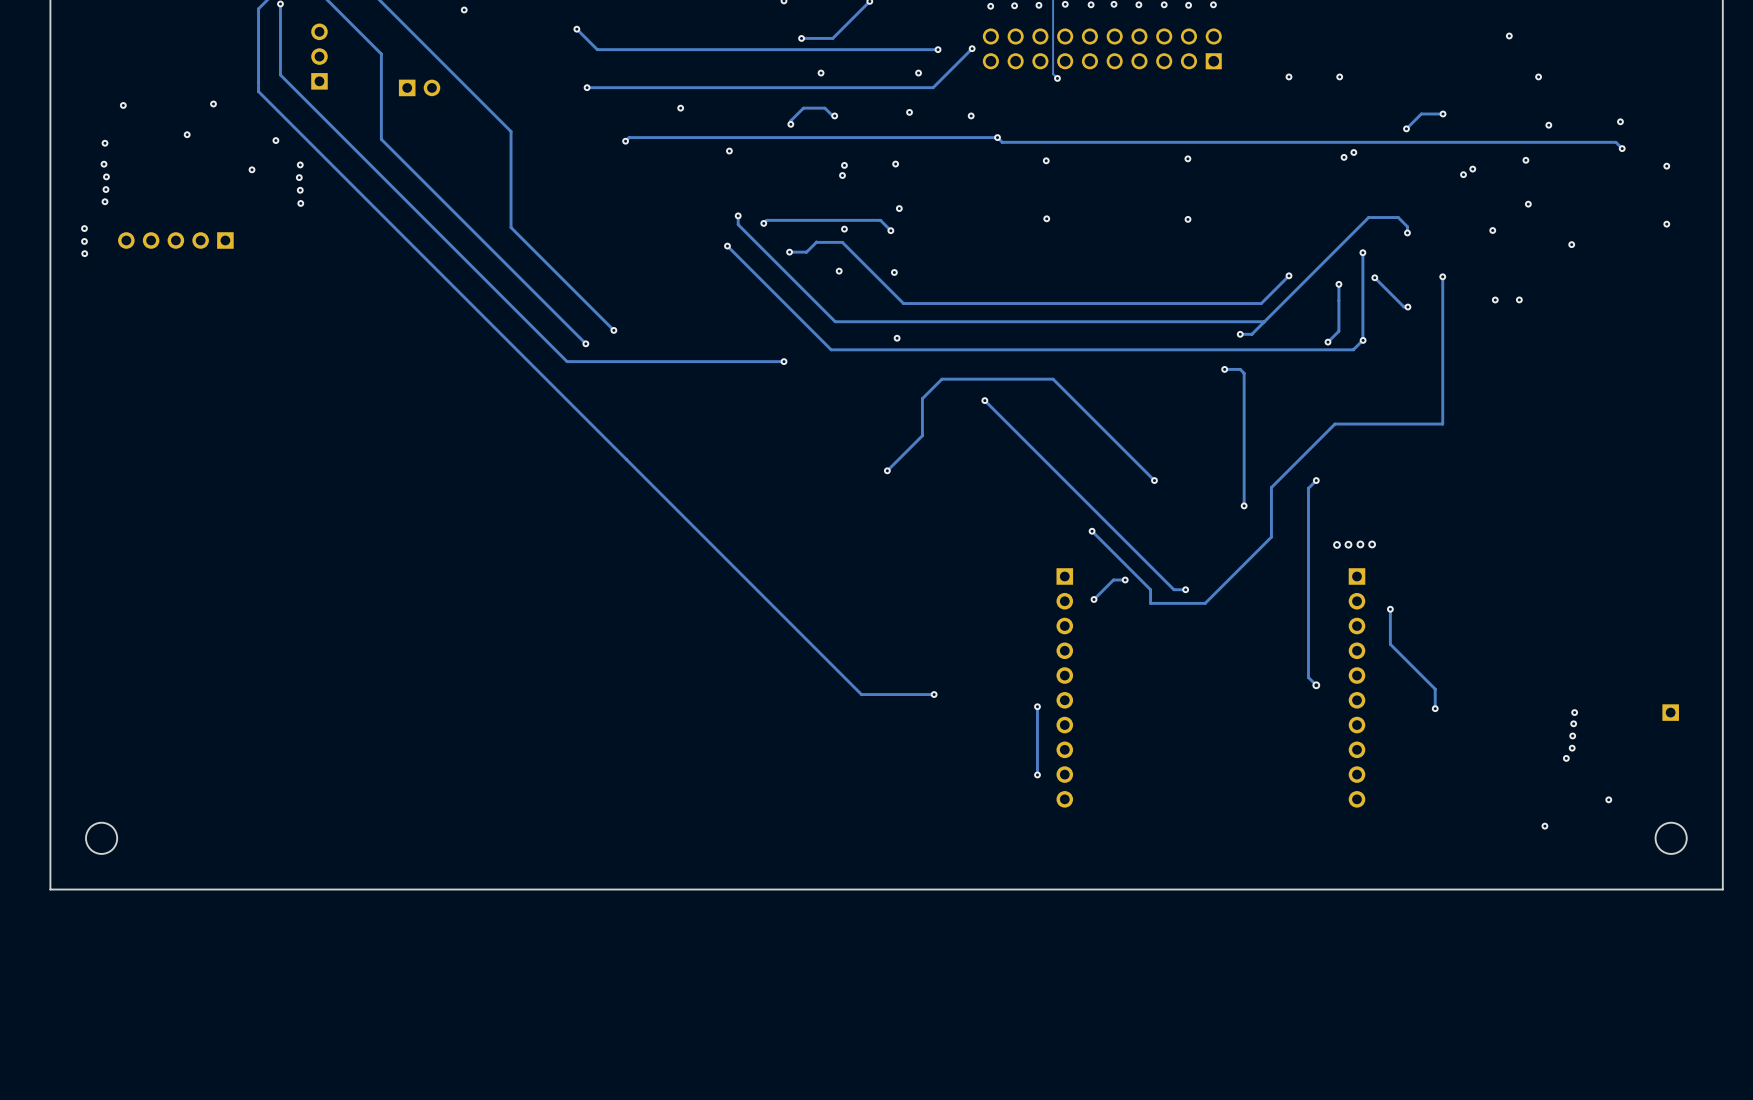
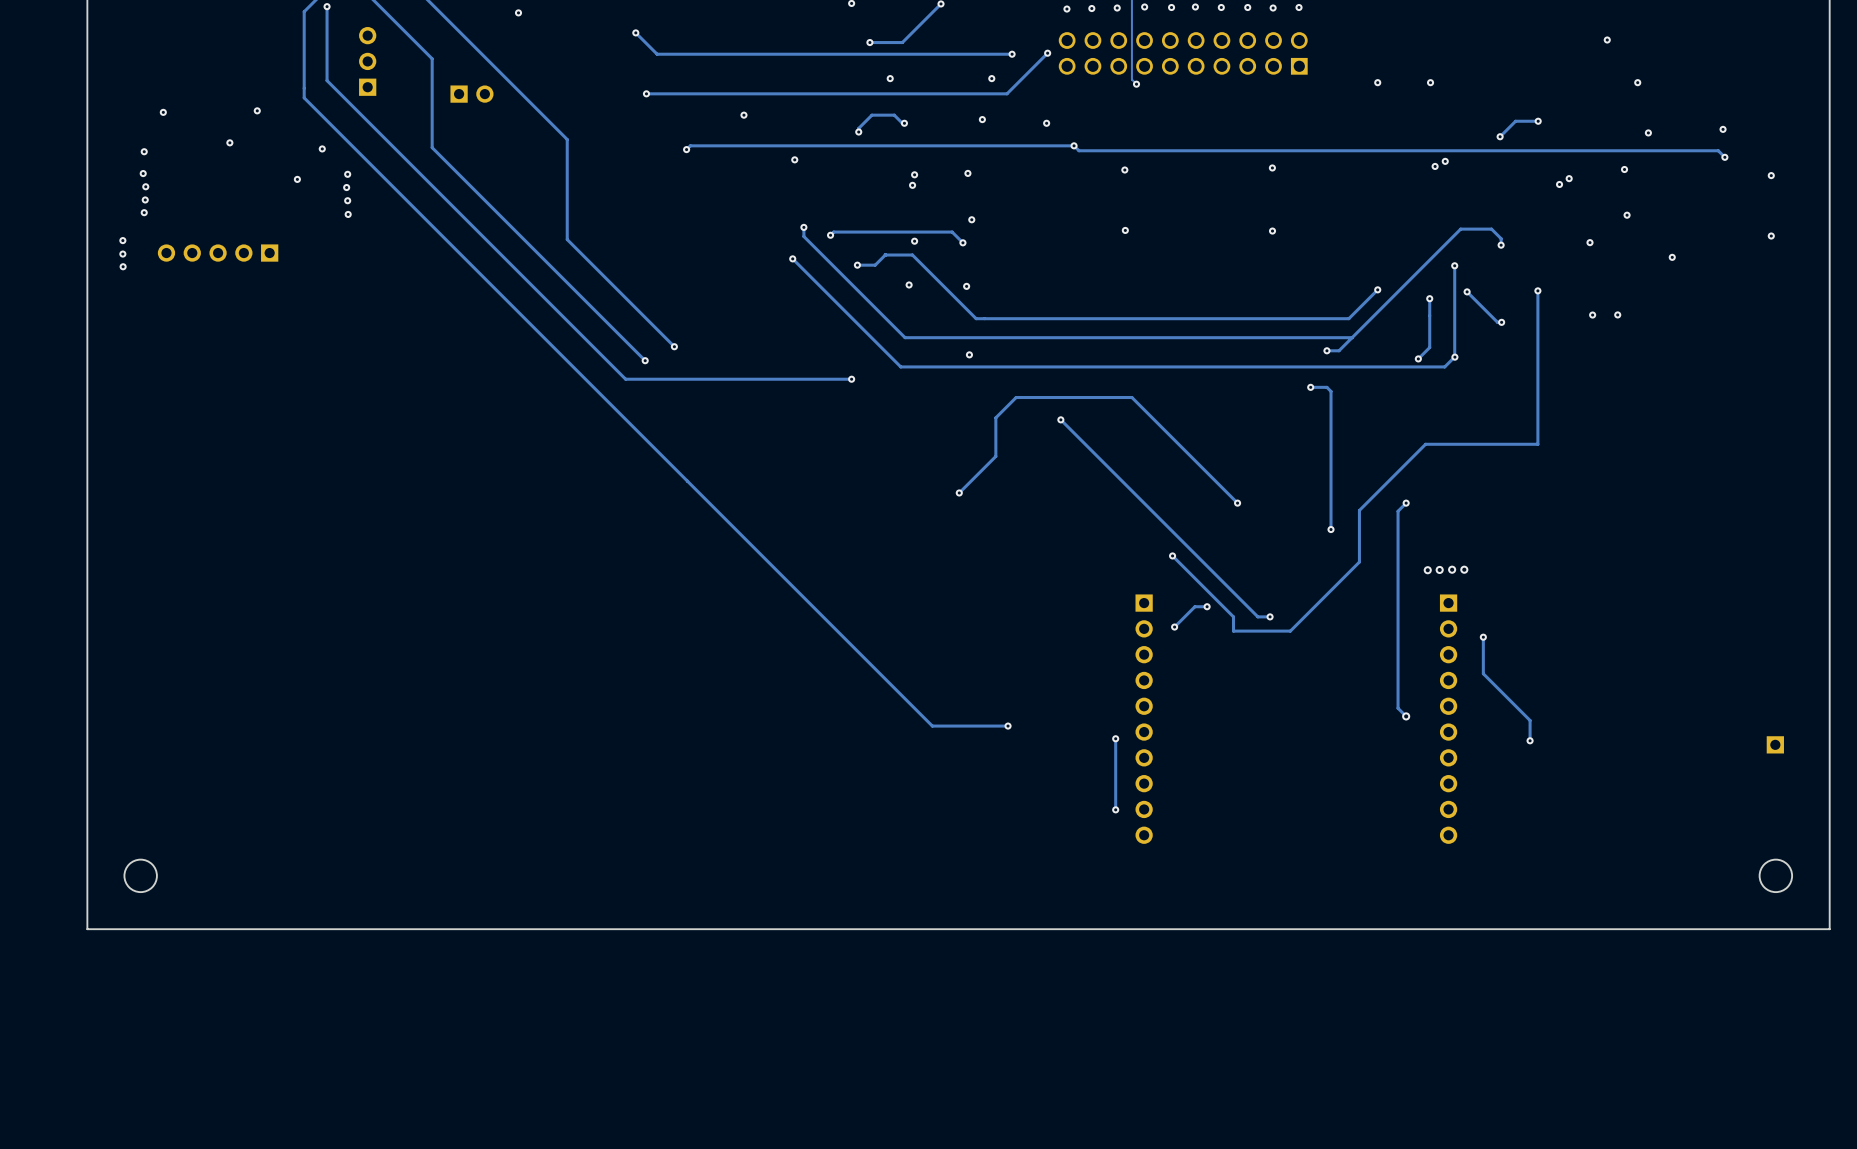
via: (1574, 712) -> none
via: (1573, 723) -> none
via: (1572, 735) -> none
via: (1572, 748) -> none
via: (1566, 758) -> none
via: (1608, 799) -> none
via: (1544, 826) -> none

